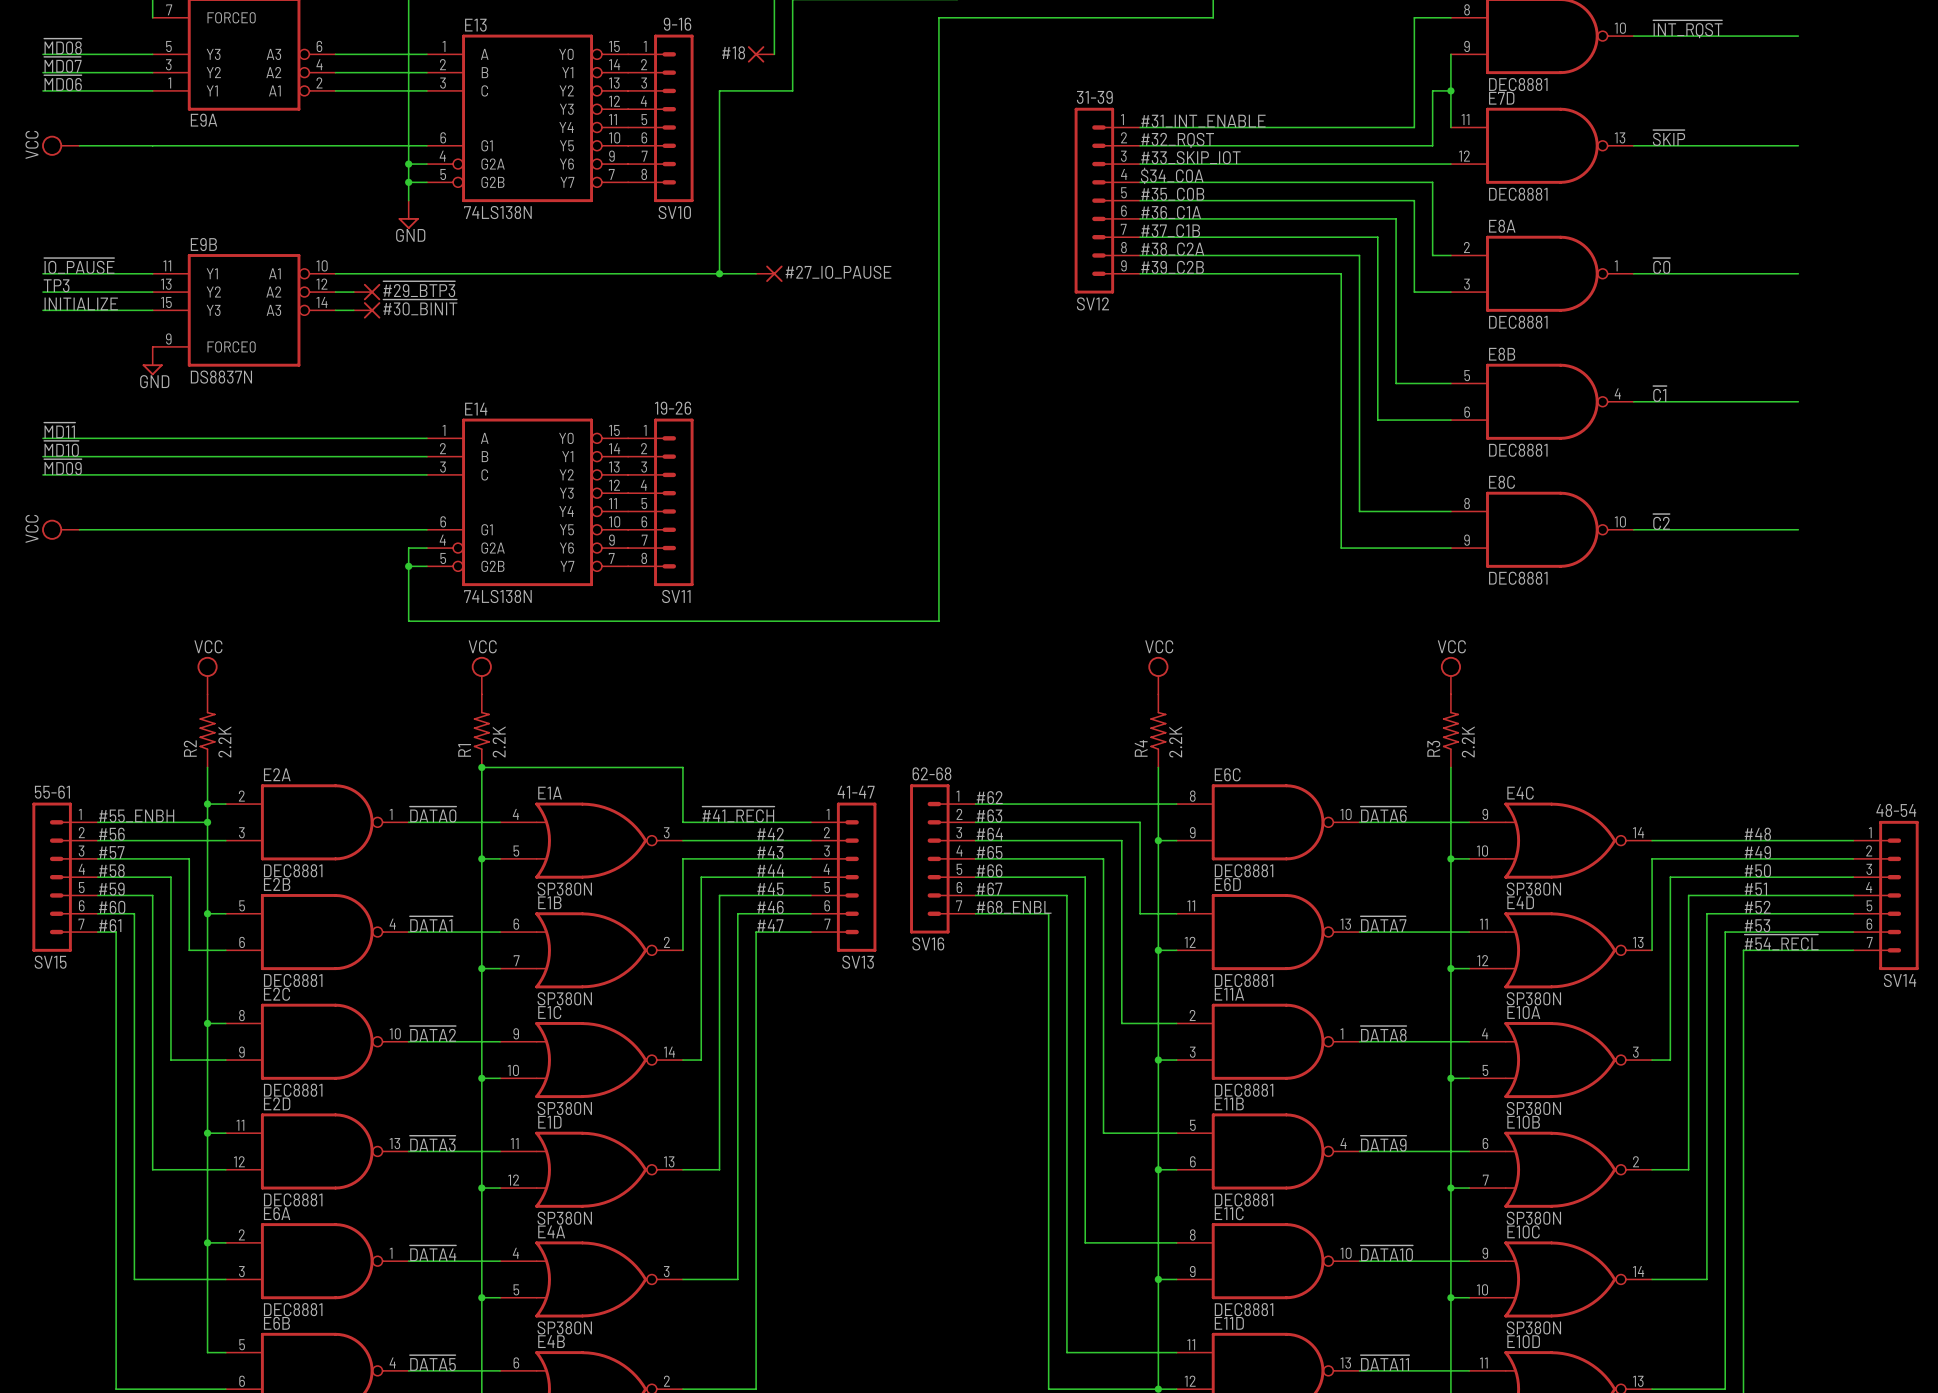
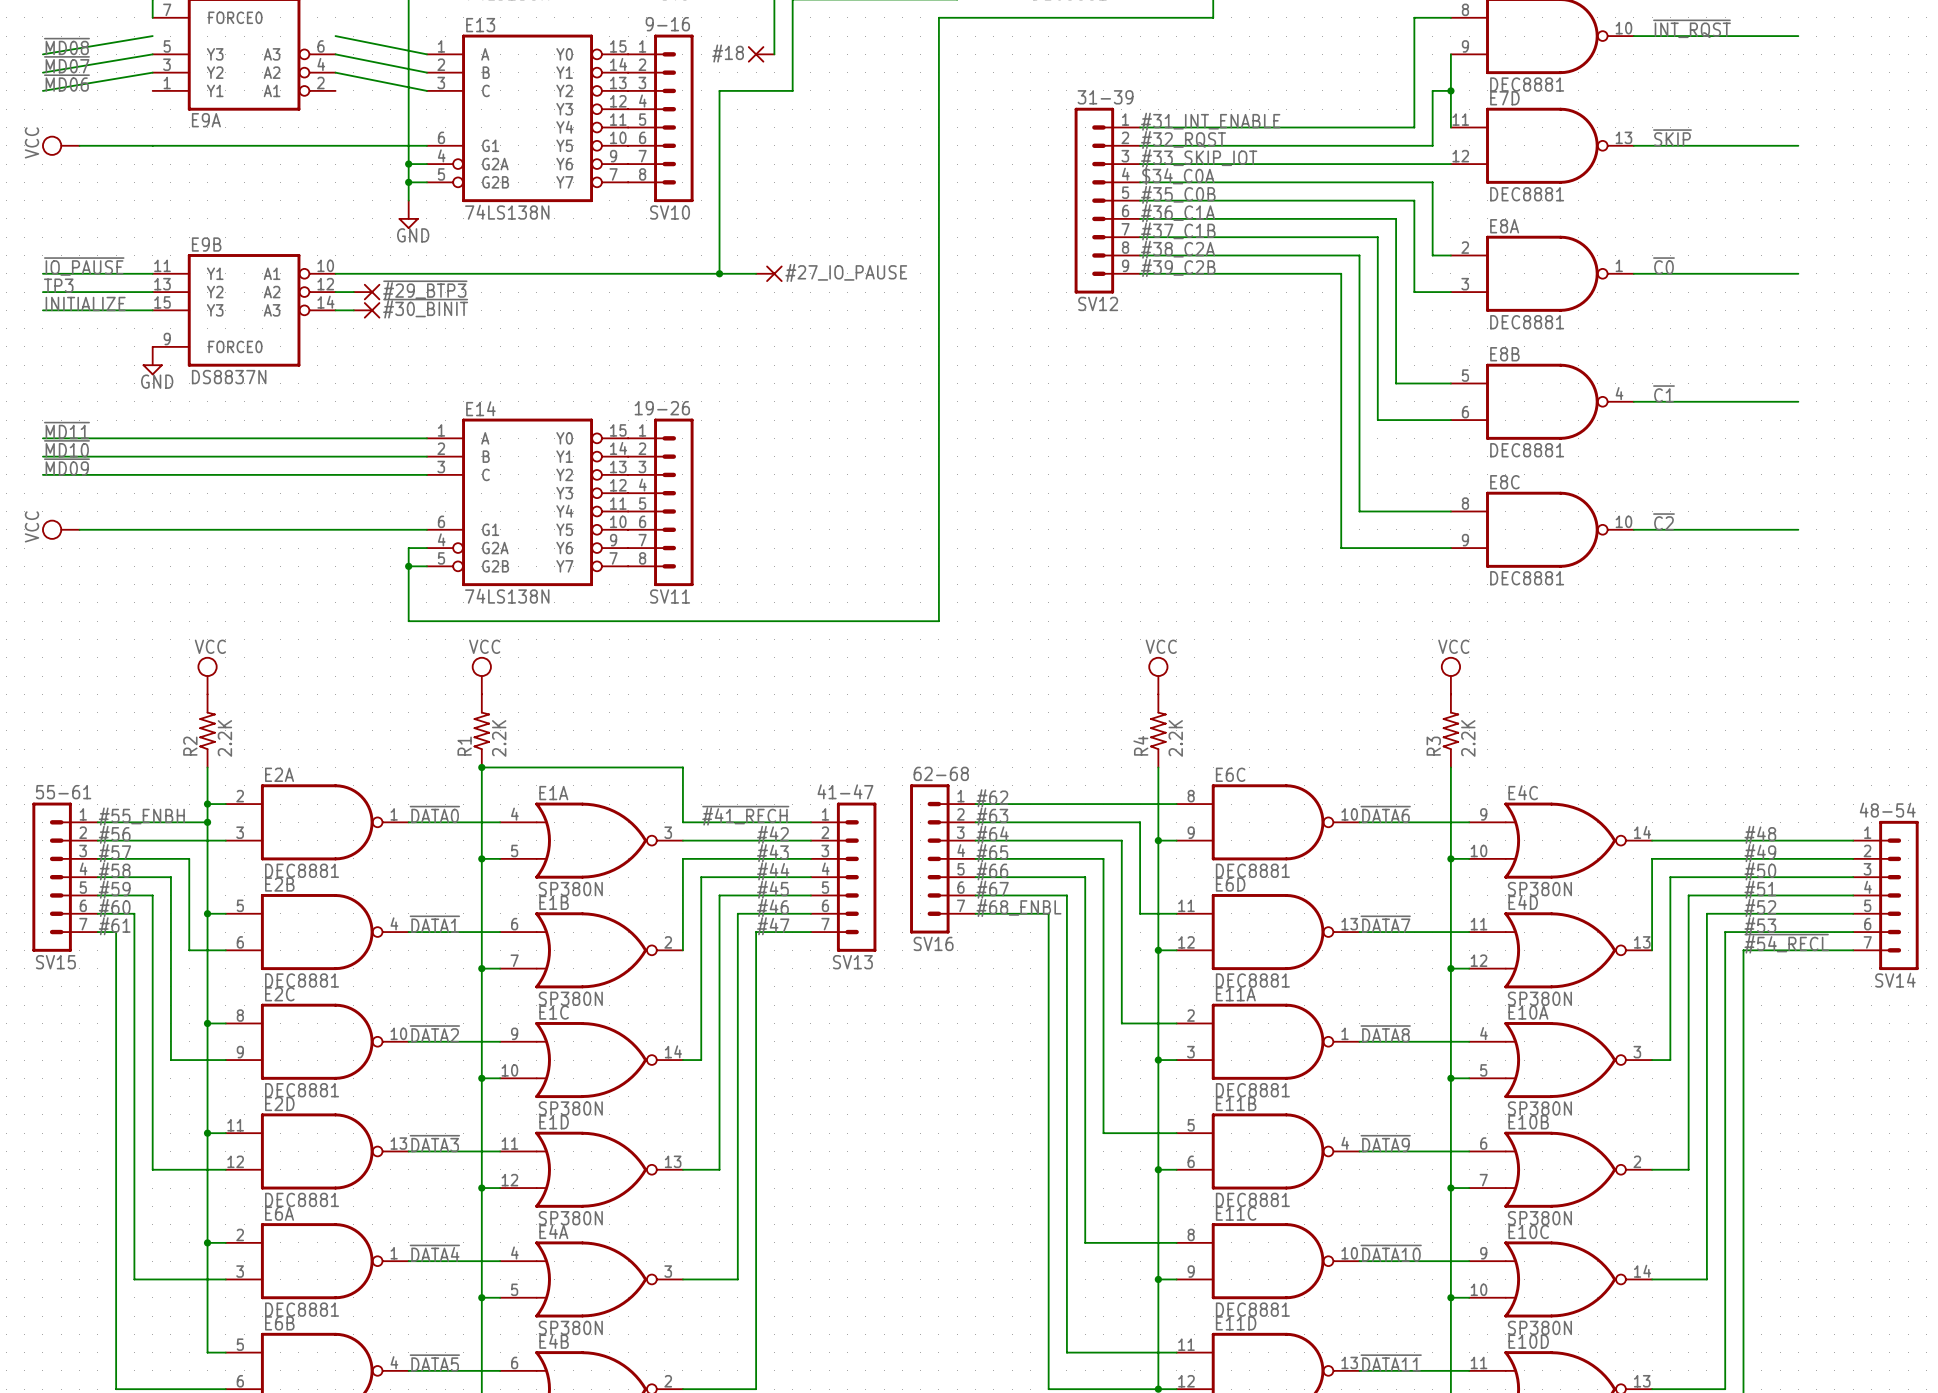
wire: (42, 54) (152, 54) -> (42, 54) (152, 36)
wire: (335, 54) (426, 54) -> (335, 36) (426, 54)
wire: (42, 72) (152, 72) -> (42, 72) (152, 54)
wire: (335, 72) (426, 72) -> (335, 54) (426, 72)
wire: (42, 90) (152, 90) -> (42, 90) (152, 72)
wire: (335, 90) (426, 90) -> (335, 72) (426, 90)

